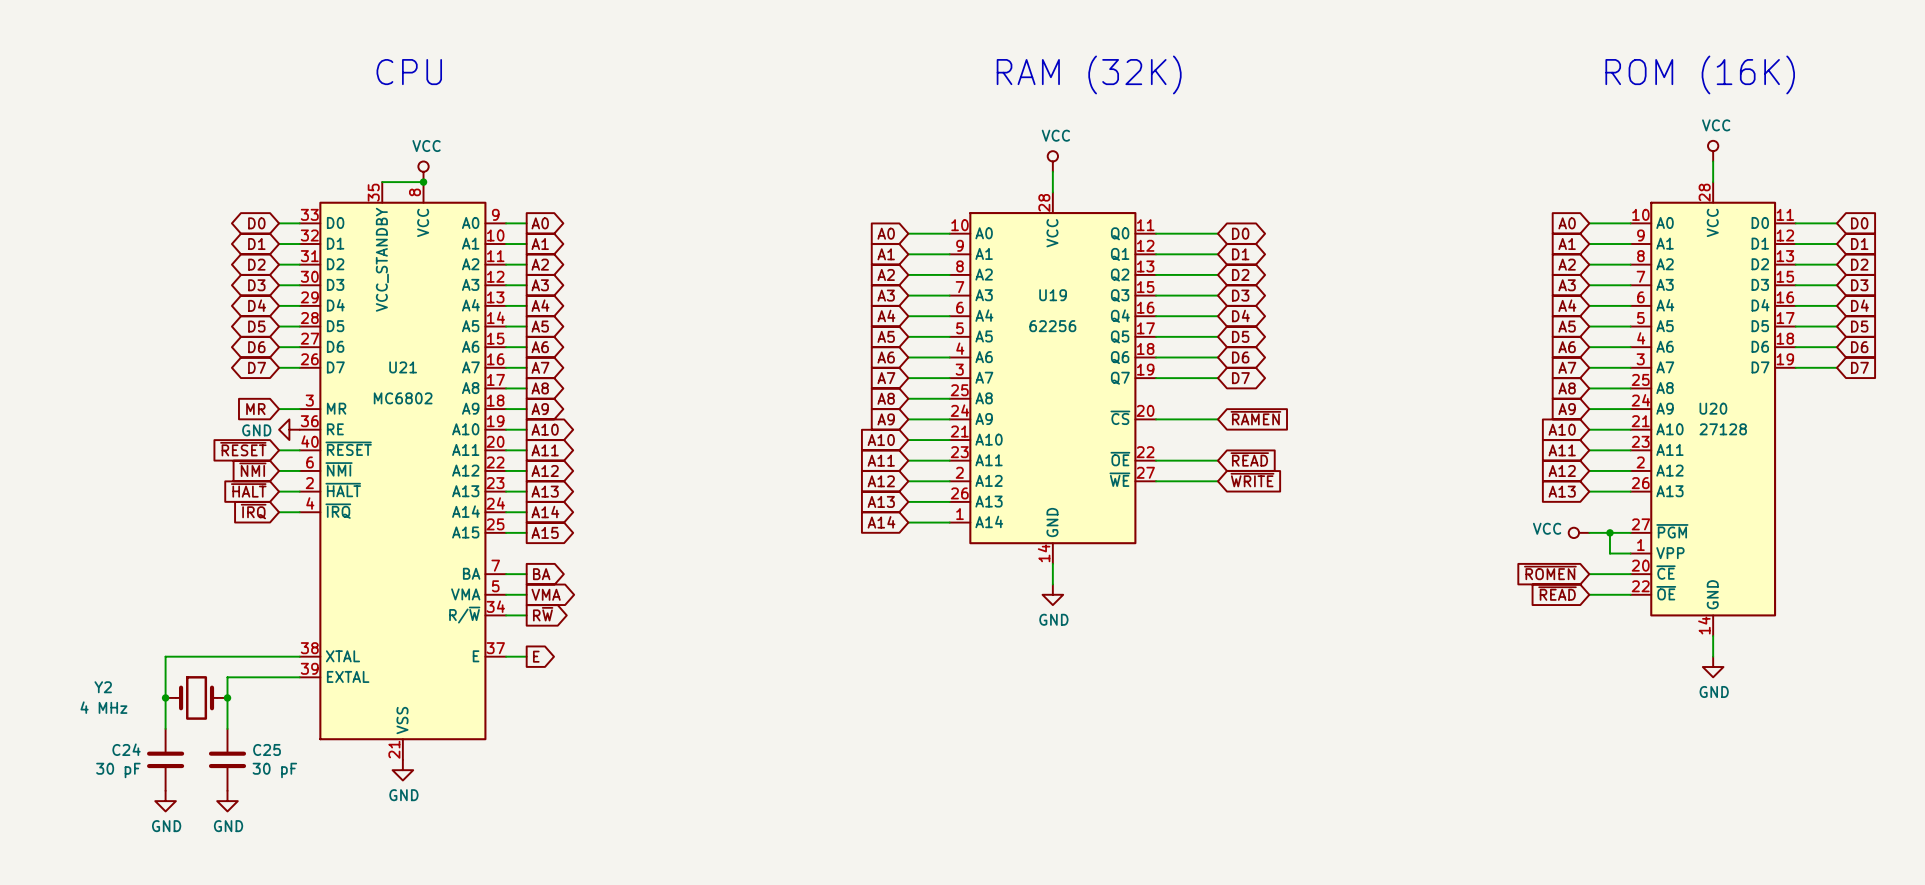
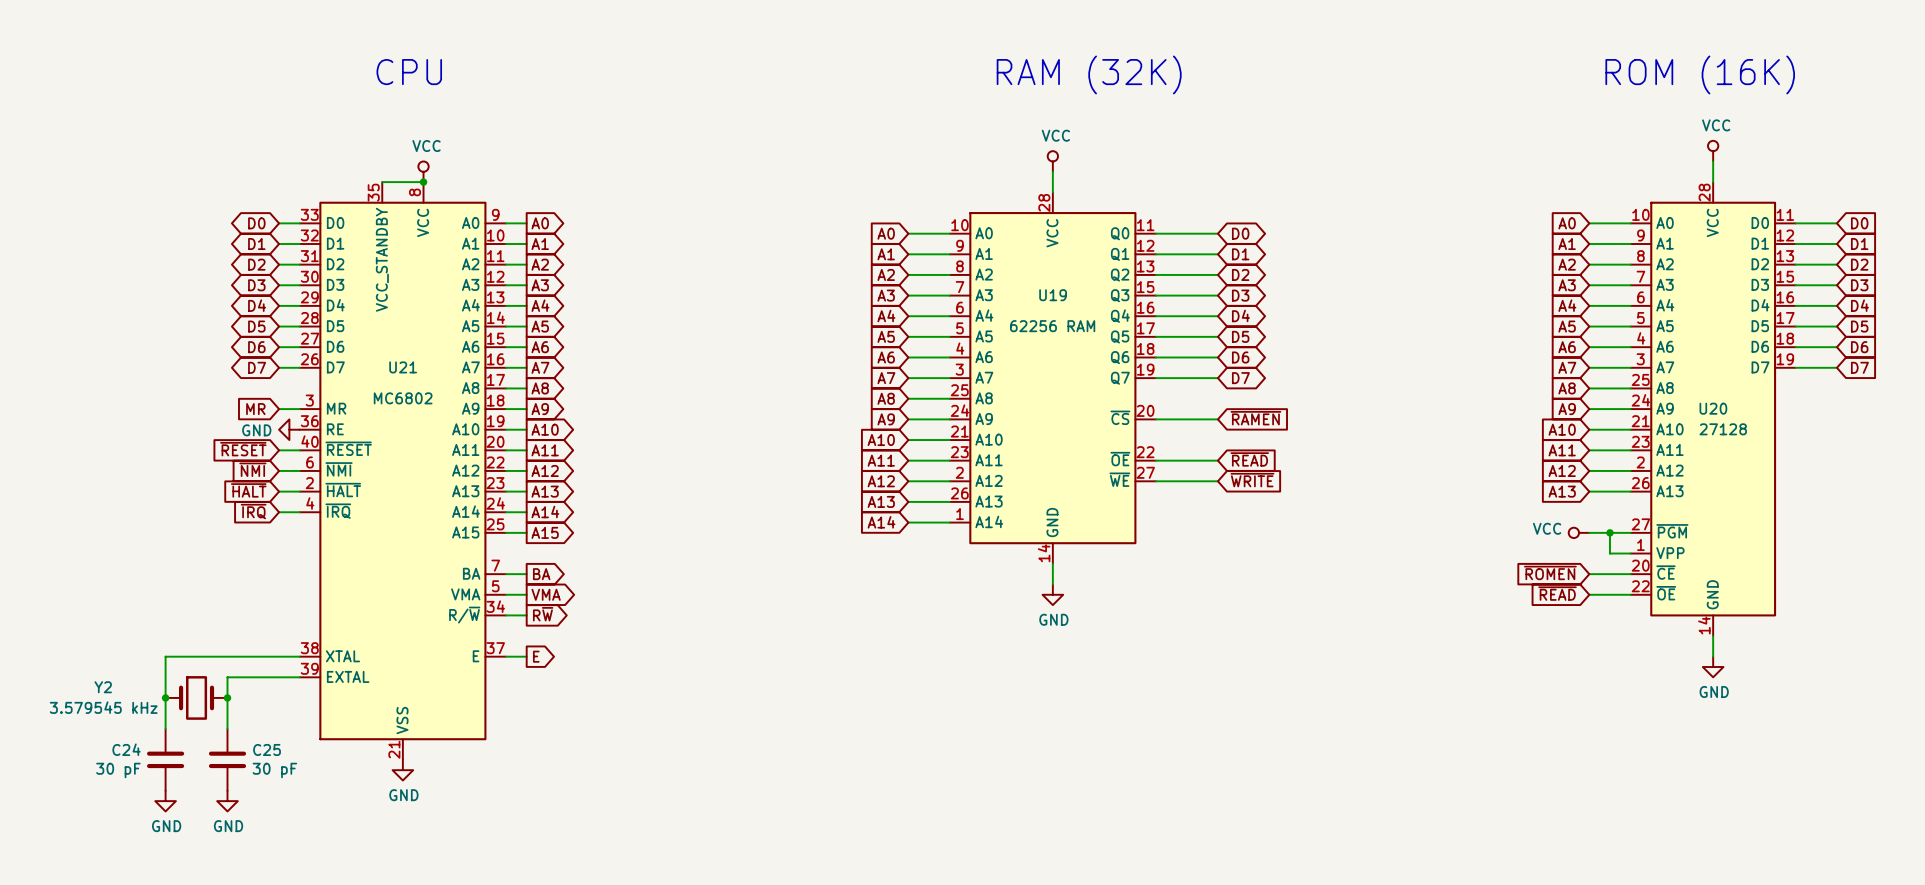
U19 value: 62256 (1052, 326) -> 62256 RAM (1052, 326)
Y2 value: 4 MHz (103, 707) -> 3.579545 kHz (103, 707)

